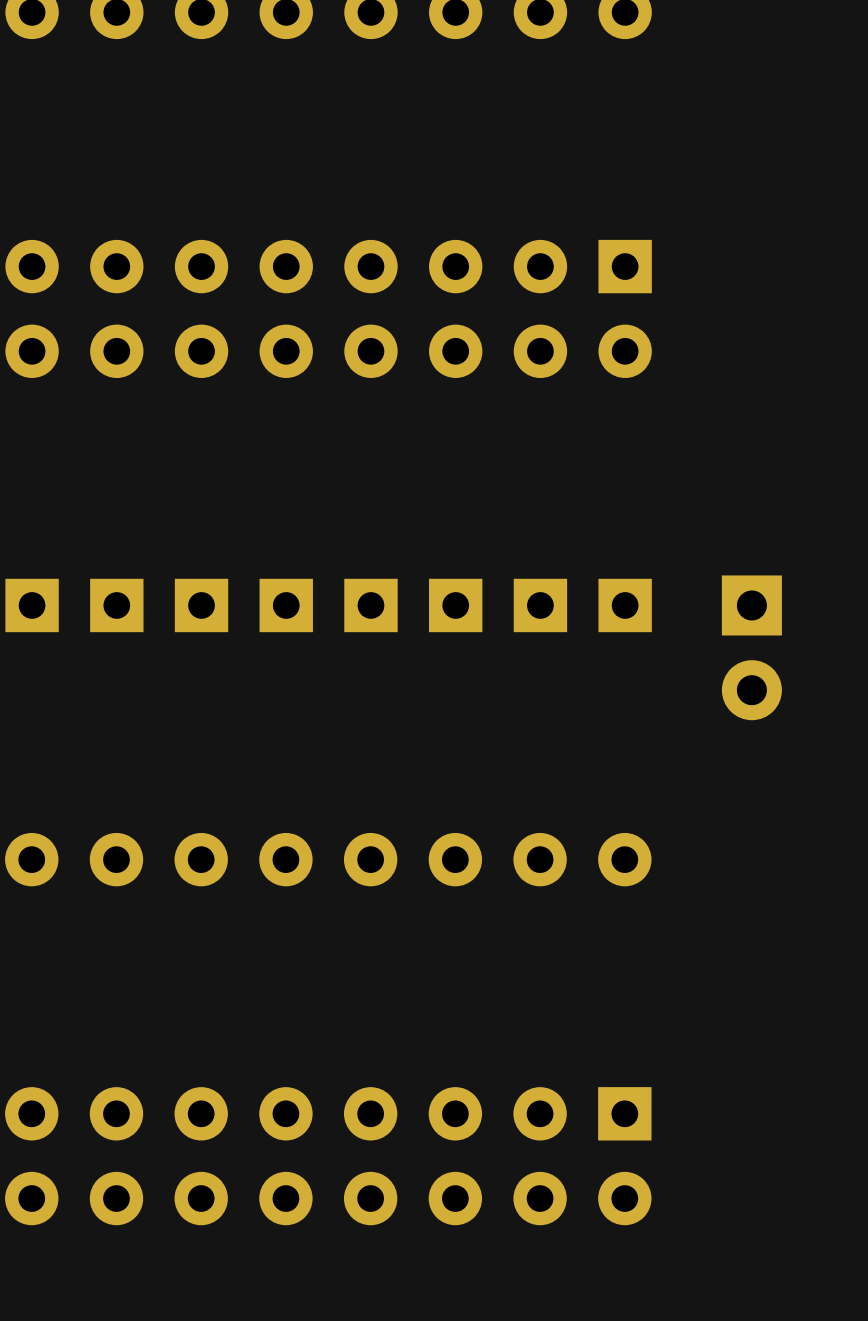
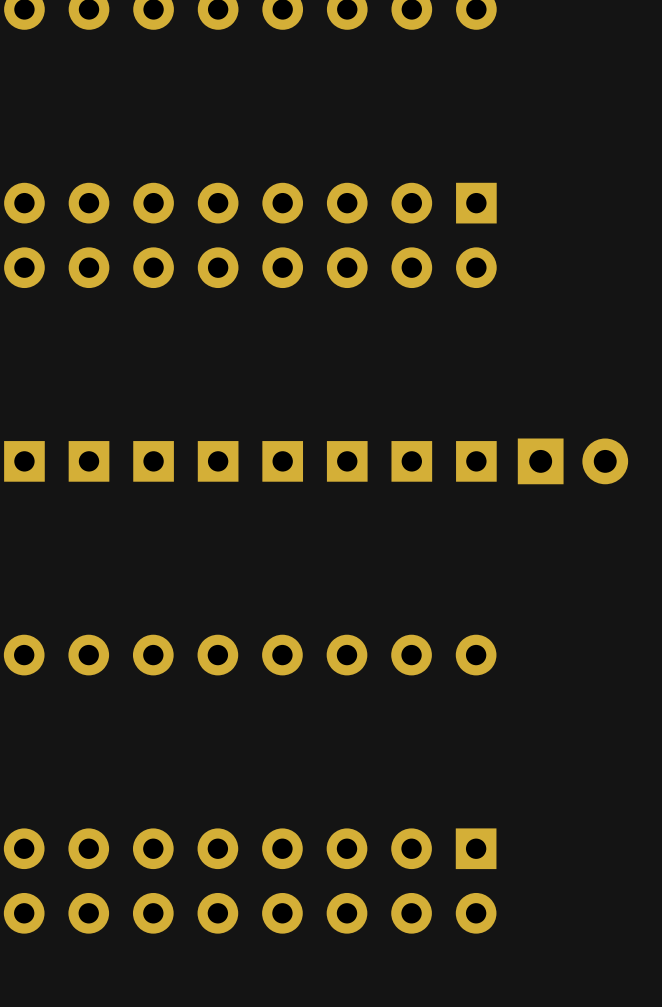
part rotation: 0° (751, 647) -> 90° counterclockwise (572, 461)

